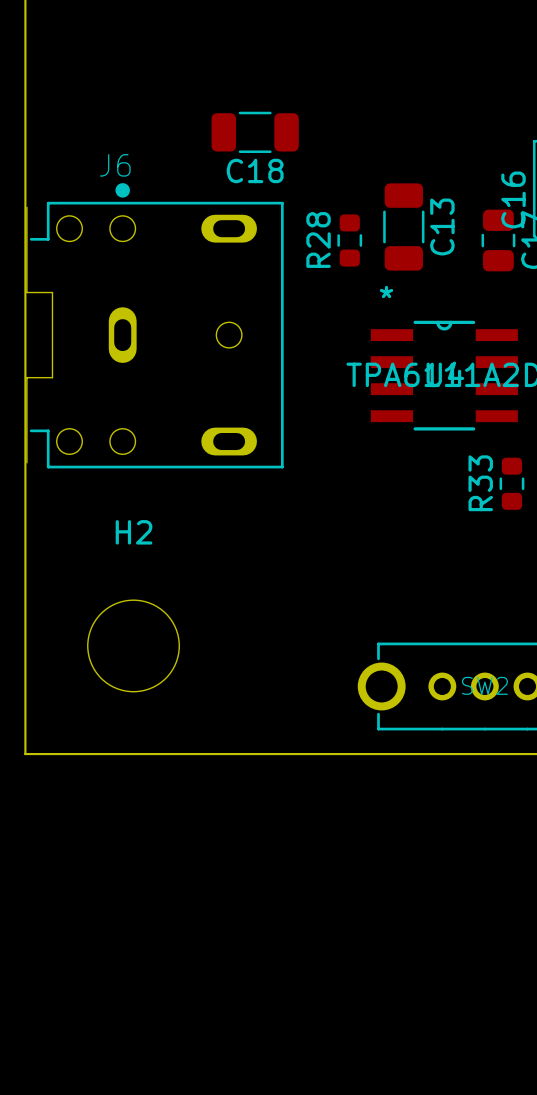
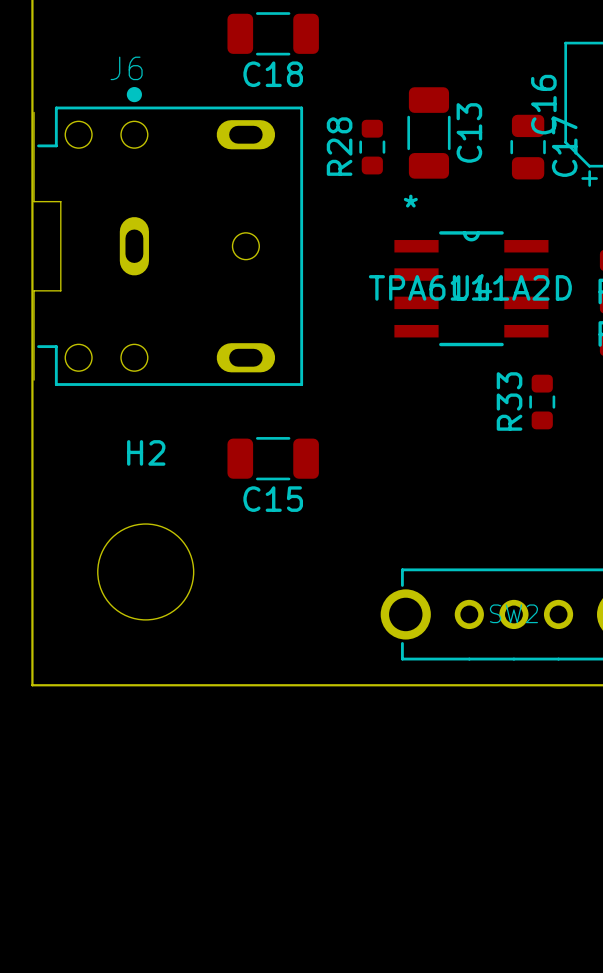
C15: none -> (273, 458)

